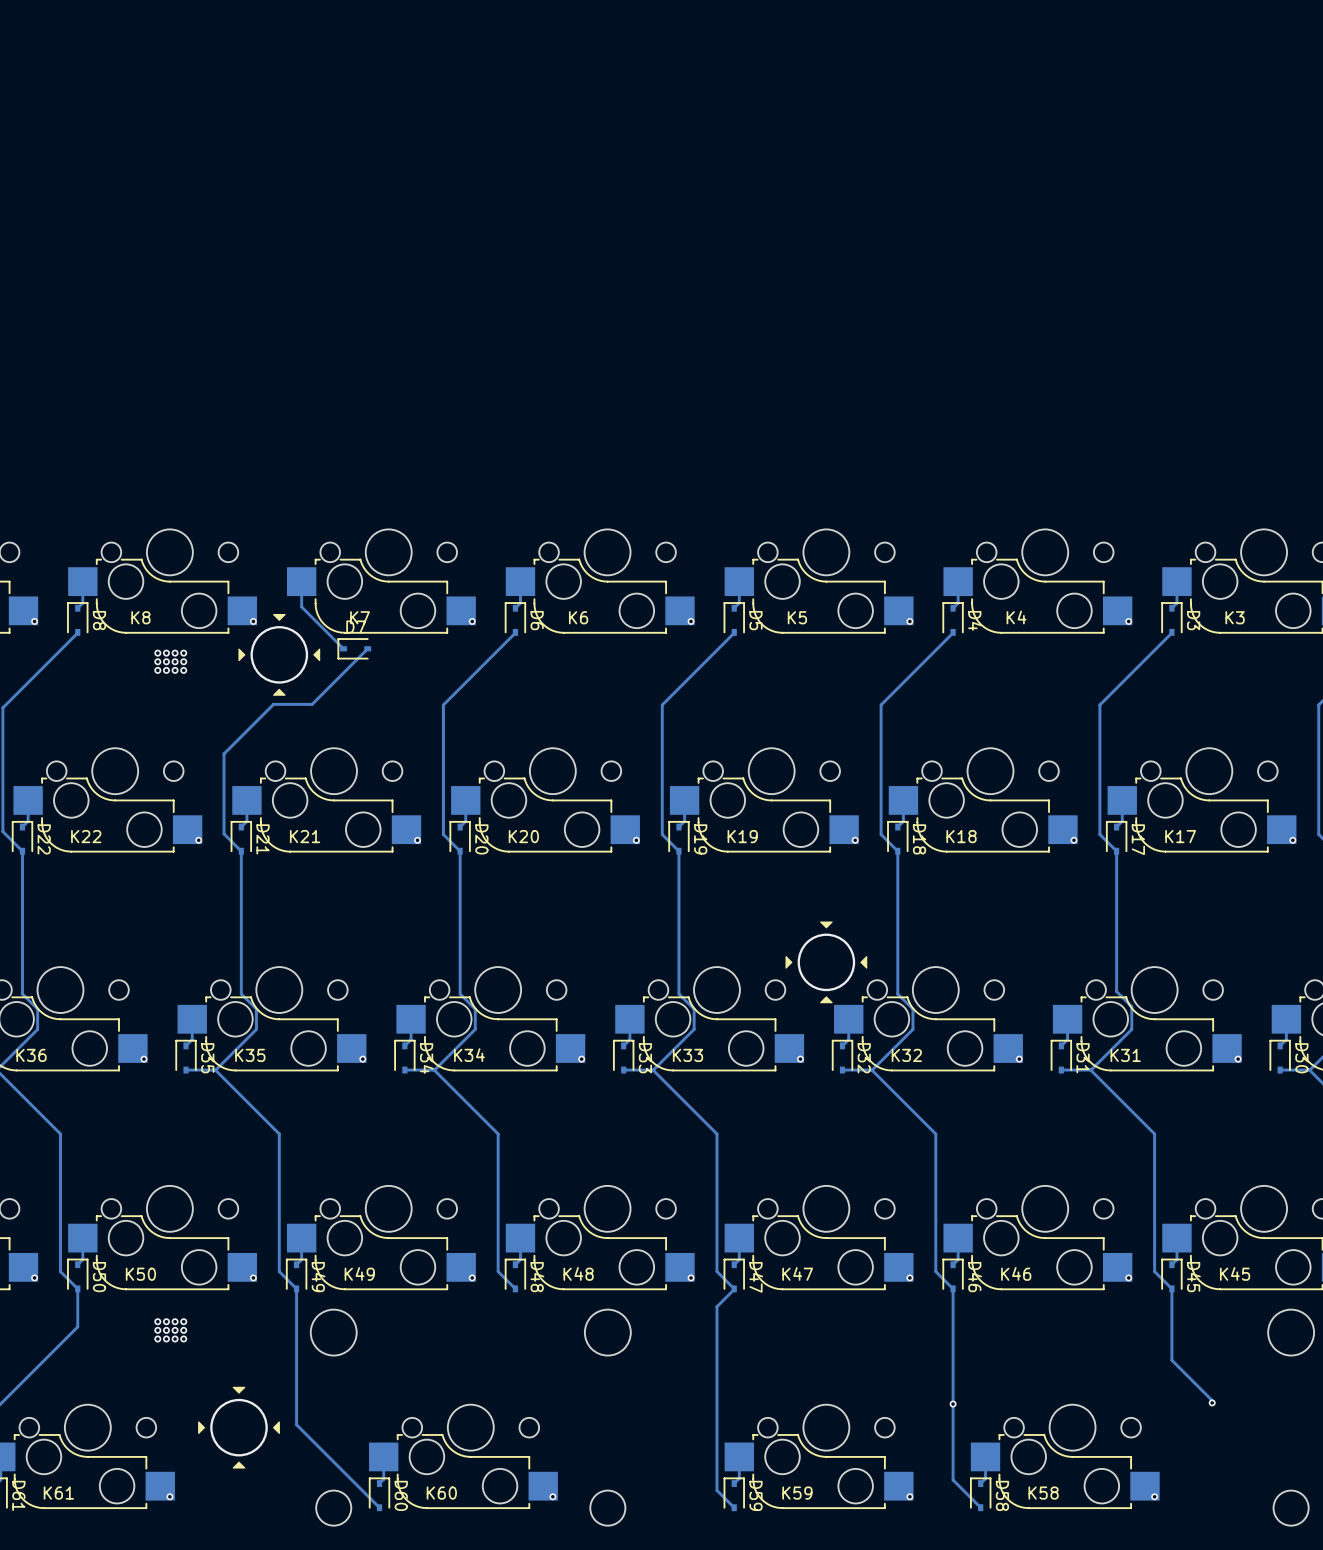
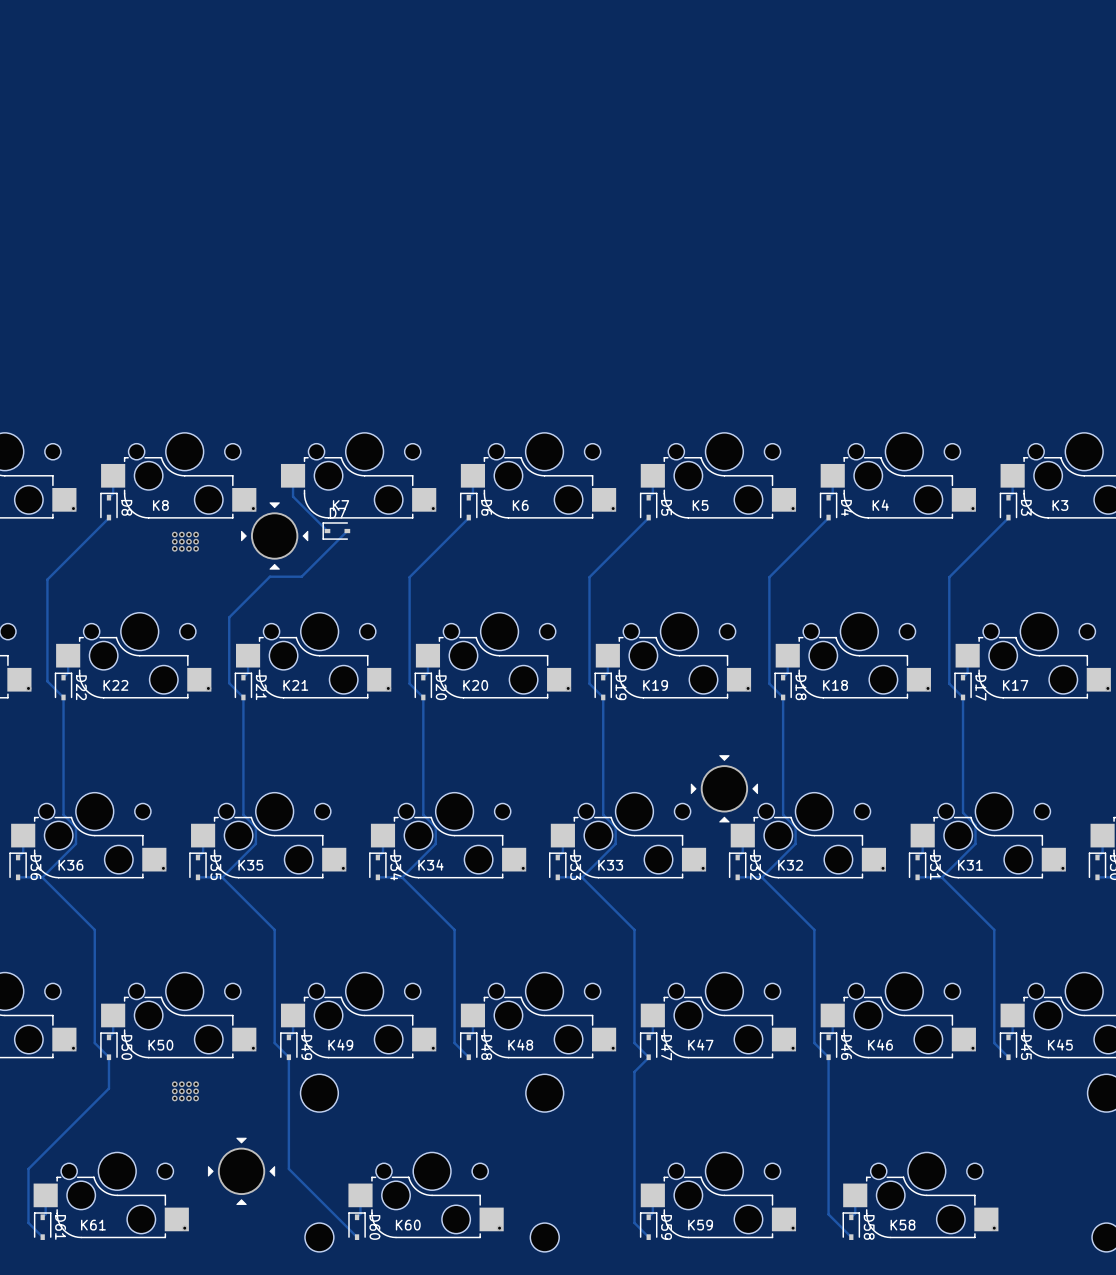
track: (1171, 1288) (1171, 1360) (1212, 1400) -> none
via: (1212, 1402) -> none
via: (953, 1404) -> none

